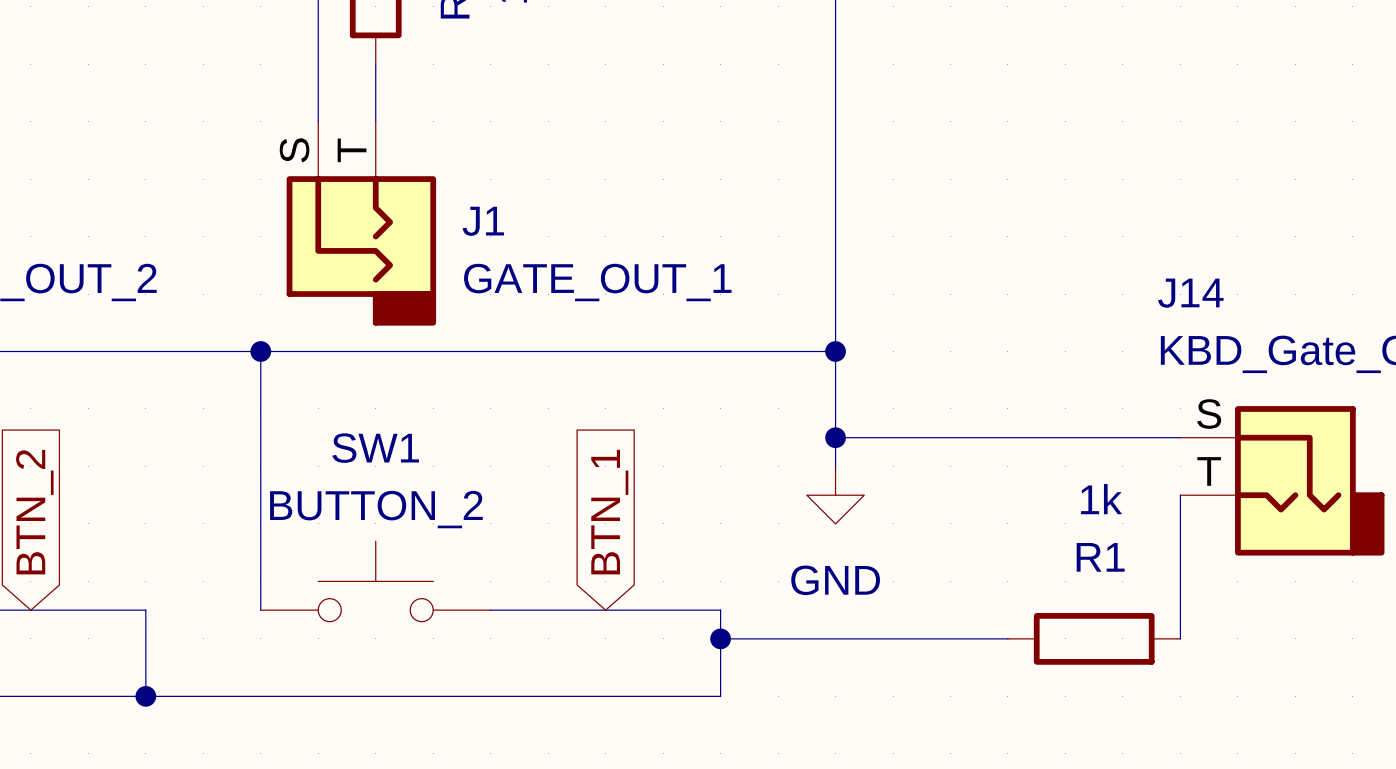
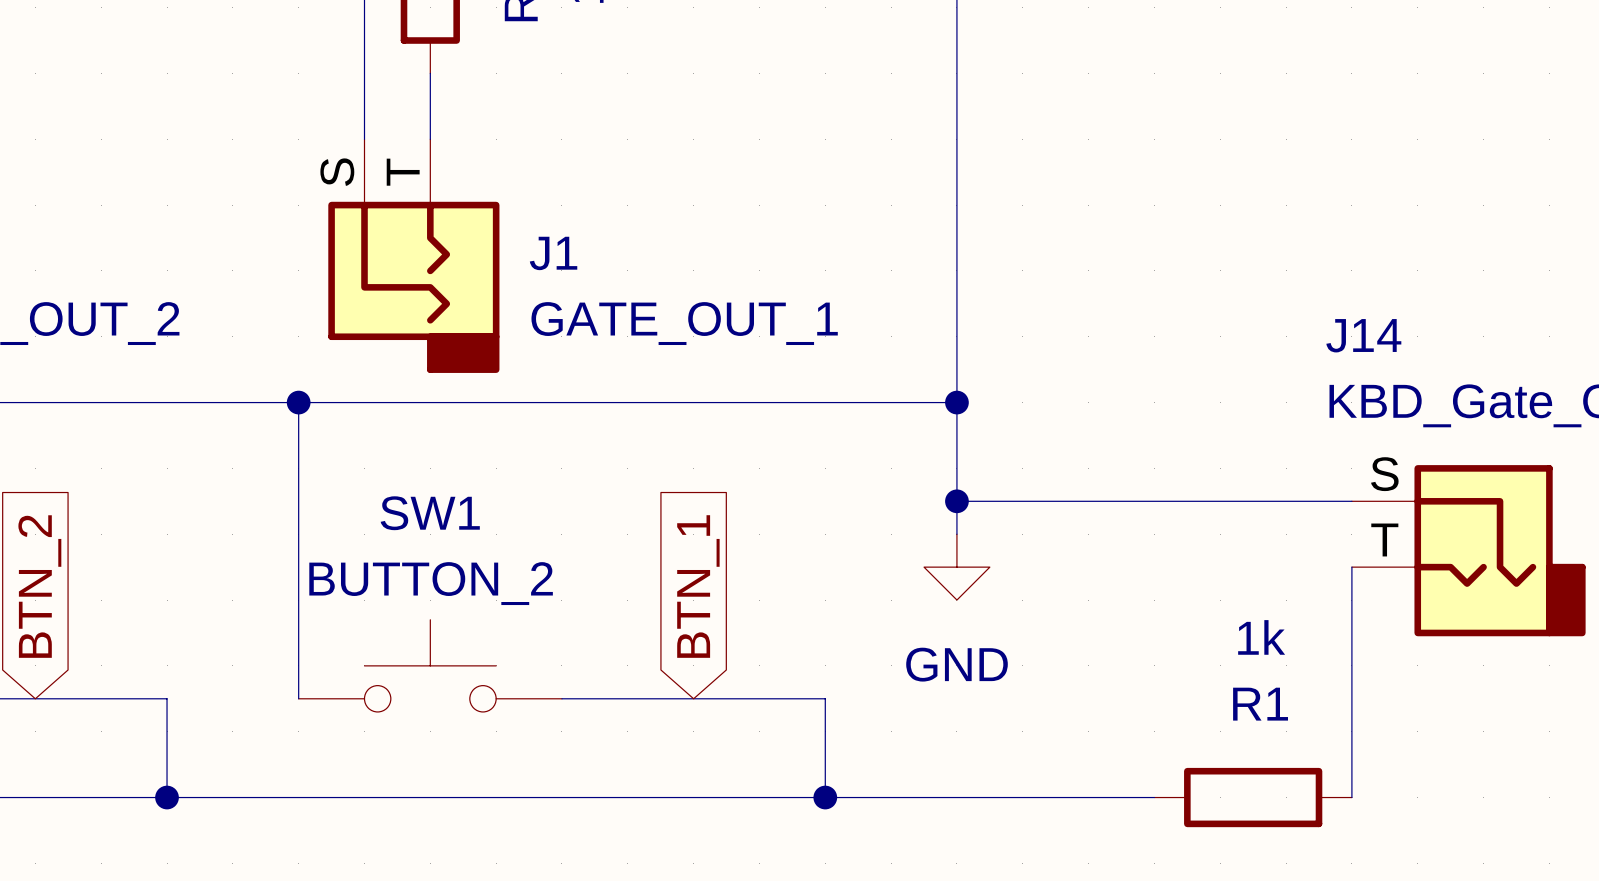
wire: (720, 638) (1007, 638) -> (825, 797) (1154, 797)
junction position: (720, 638) -> (825, 797)
R1 position: (1094, 638) -> (1253, 797)
wire: none -> (1351, 731) (1351, 797)

